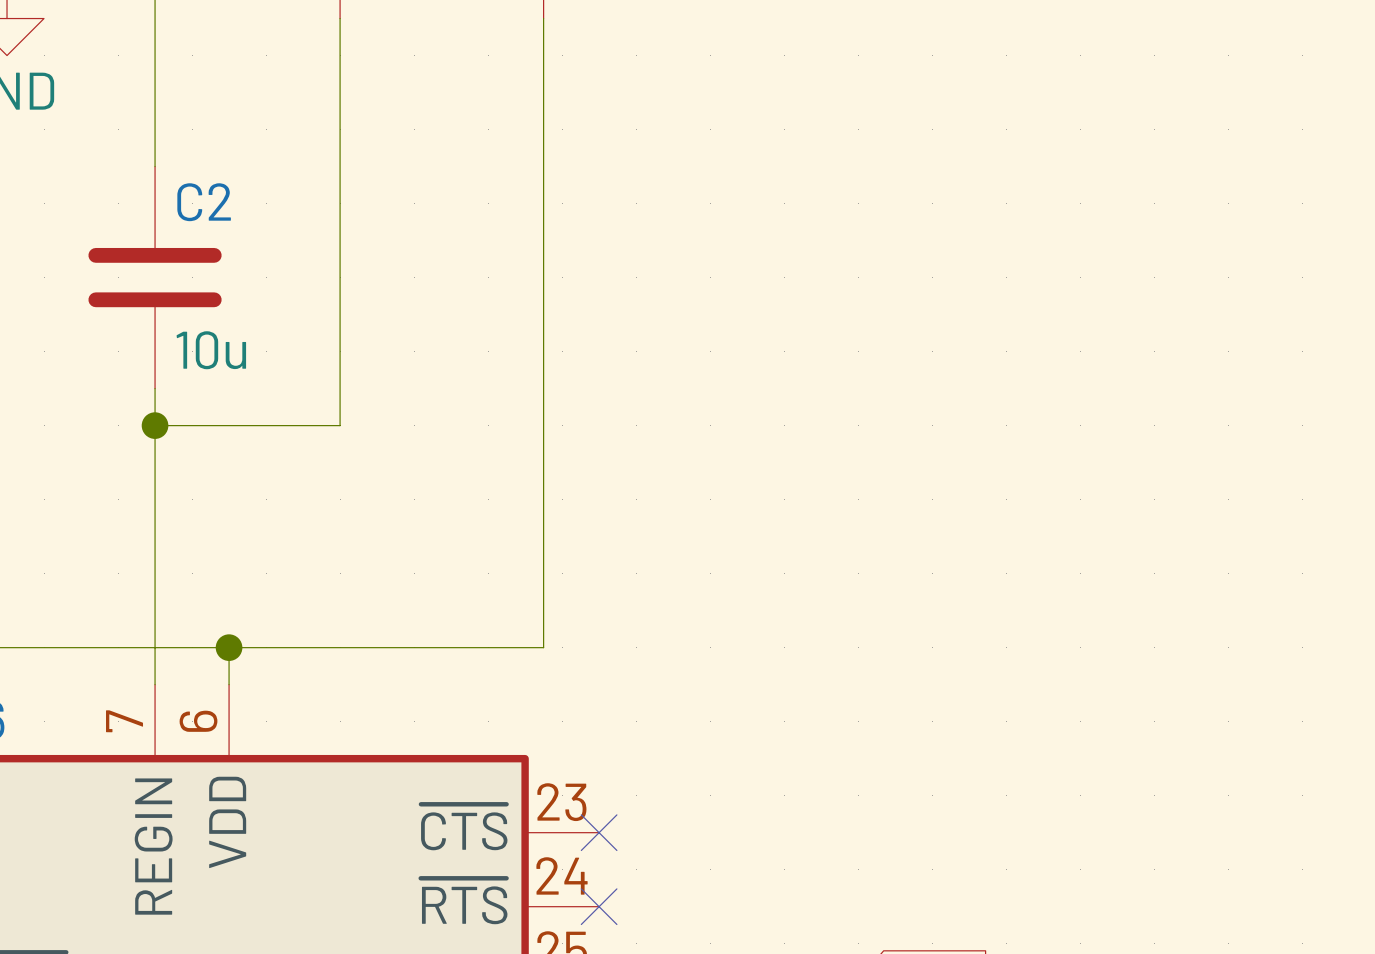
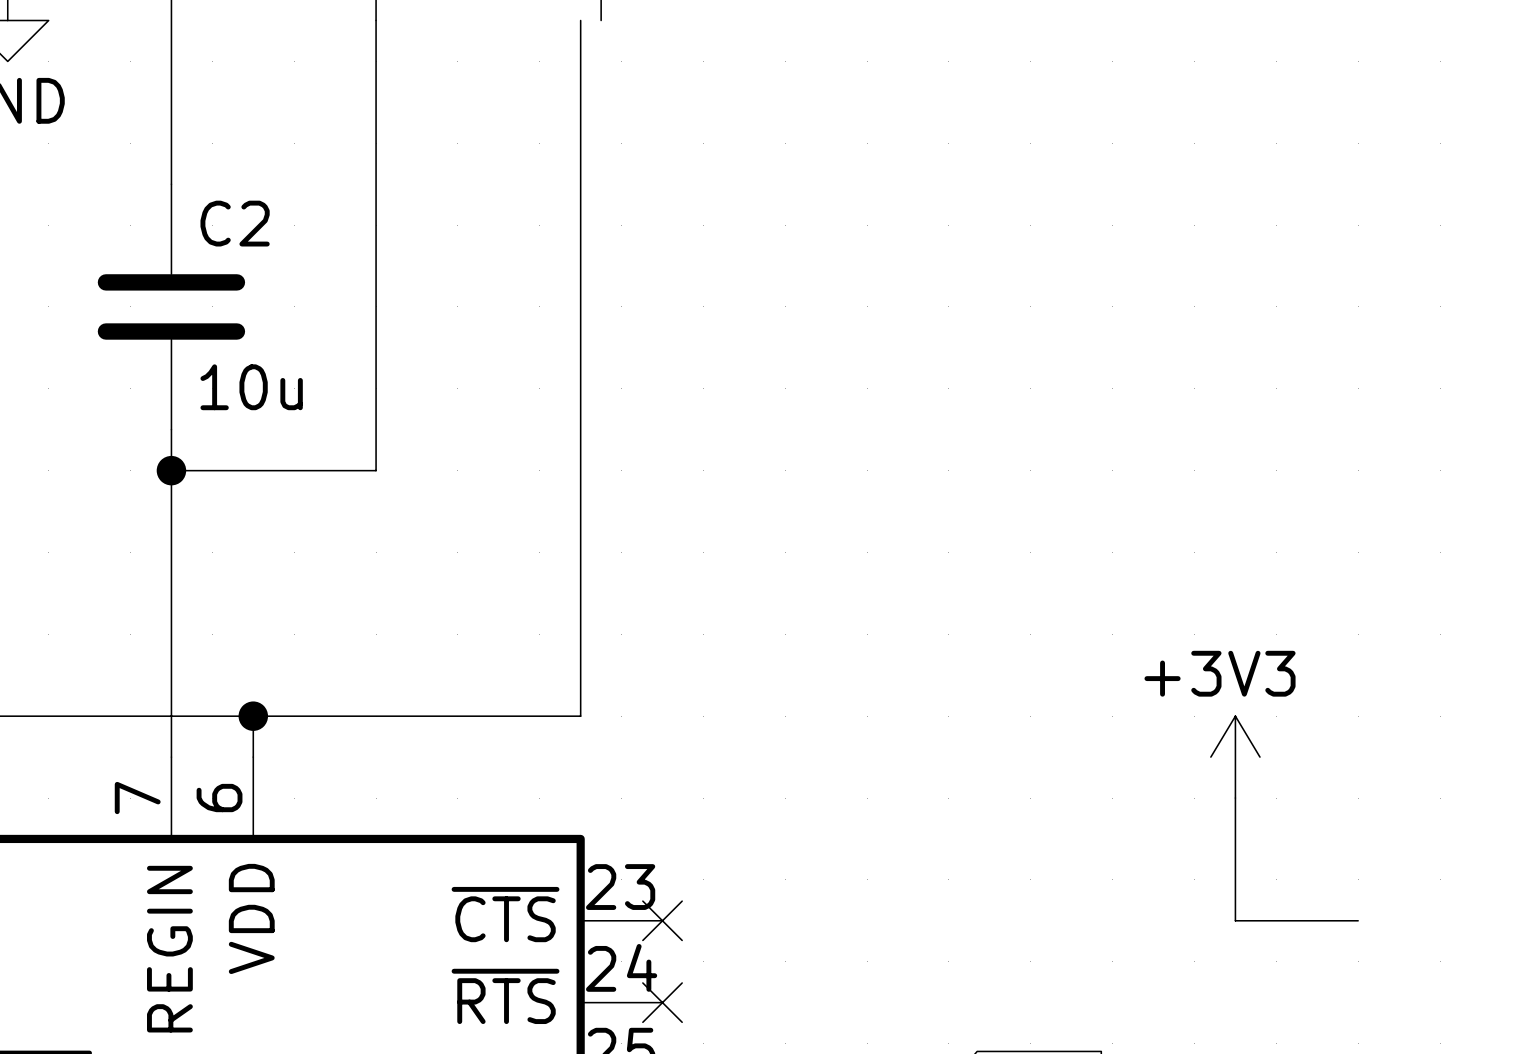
wire: (543, 18) (543, 647) (525, 647) -> (580, 20) (580, 716)
power symbol: none -> +3V3 (1235, 757)
wire: none -> (1235, 798) (1235, 920) (1358, 920)

